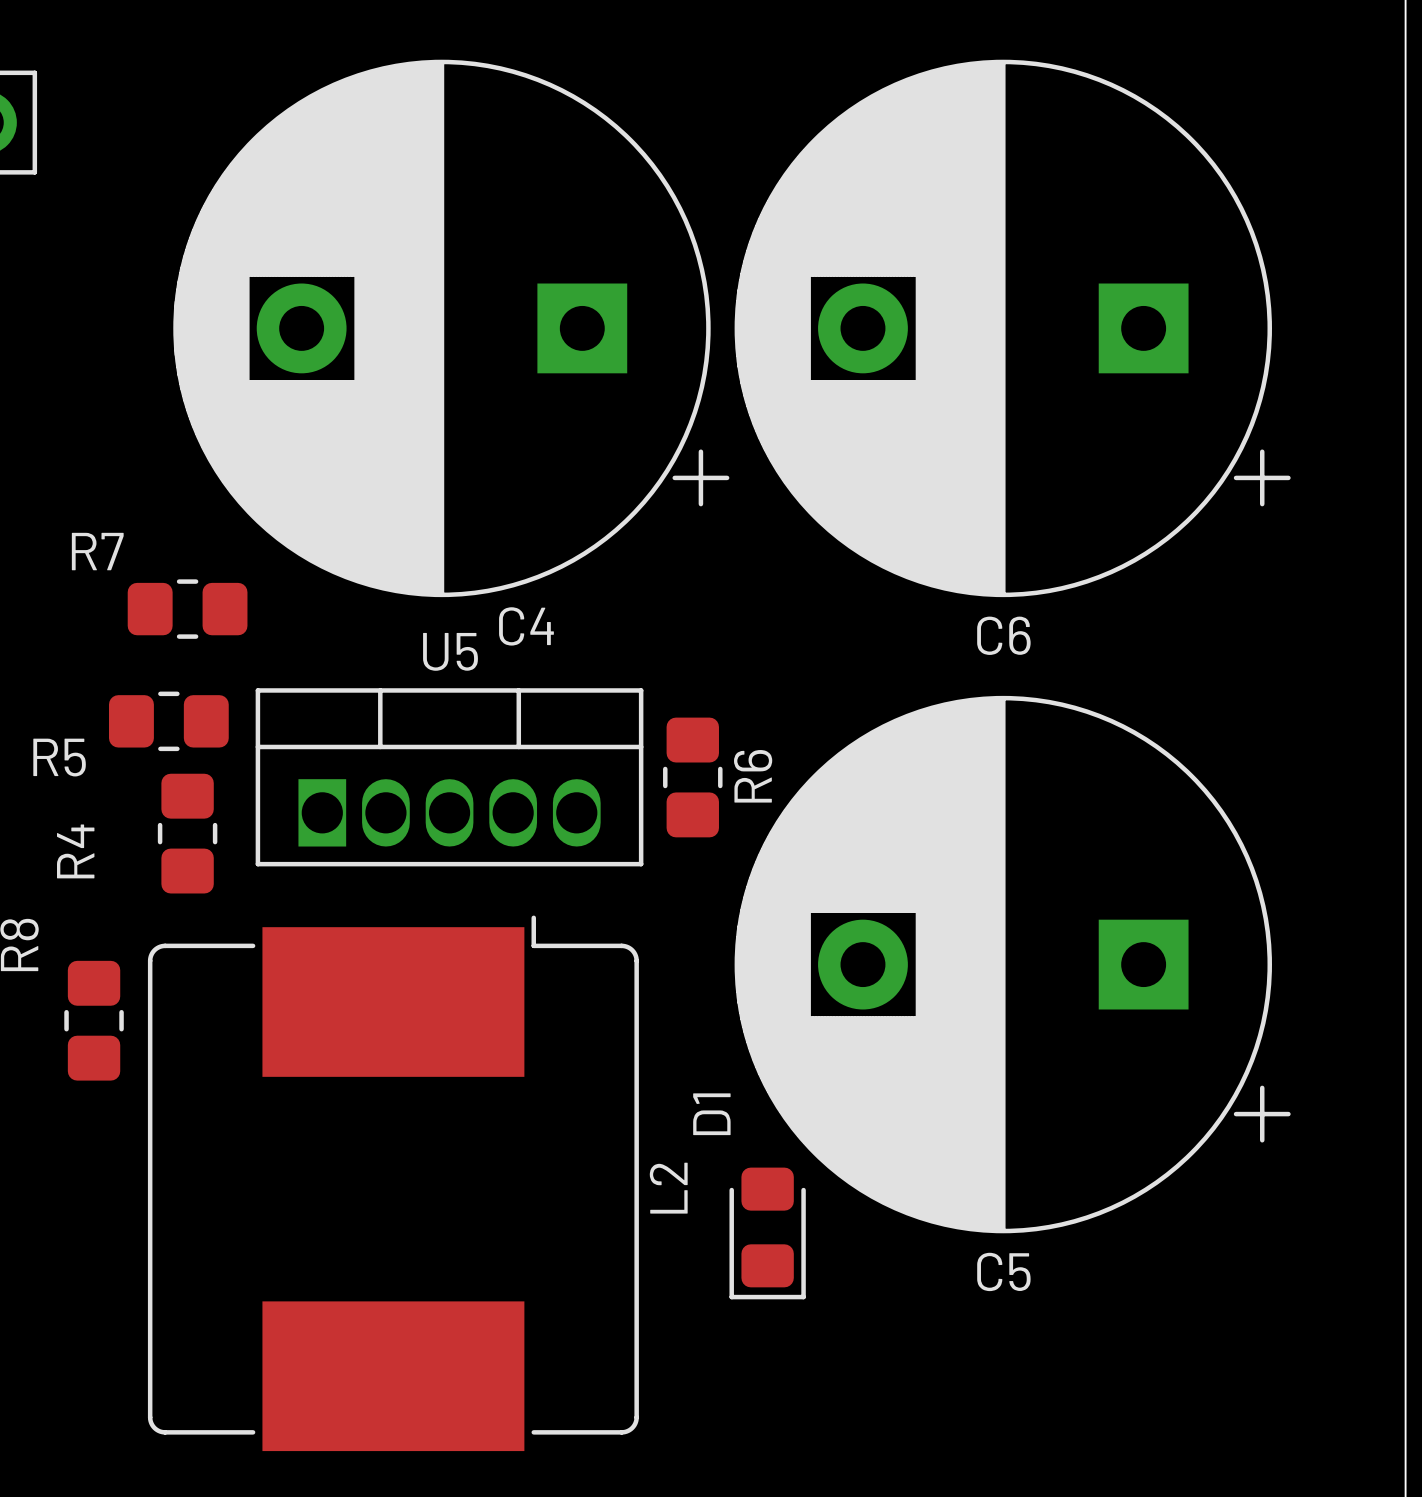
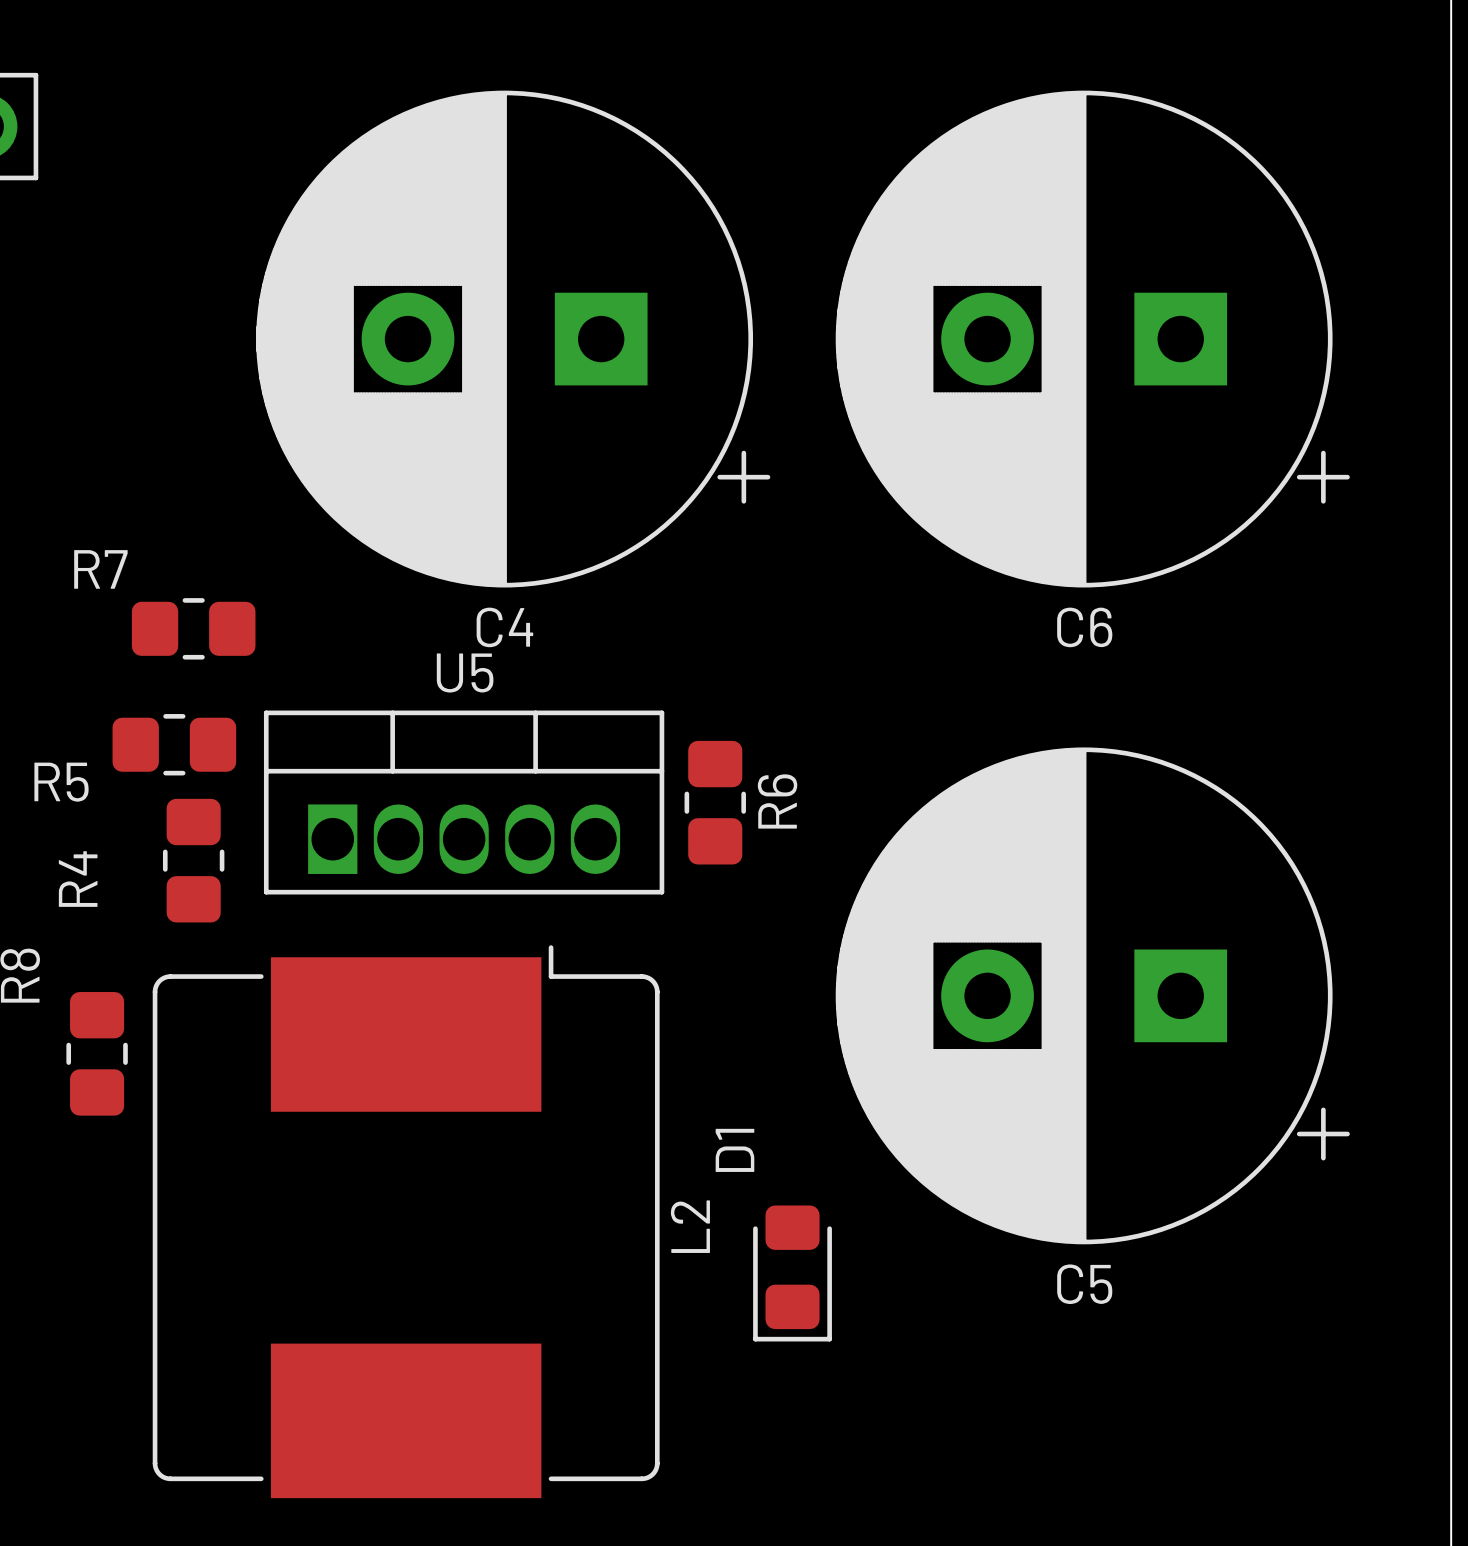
C4 footprint: [173, 59, 730, 598] -> [256, 90, 771, 588]
C6 footprint: [734, 59, 1291, 598] -> [835, 90, 1350, 588]
C4 name position: C4 (526, 626) -> C4 (504, 627)
C5 footprint: [734, 695, 1291, 1234] -> [835, 747, 1350, 1245]

